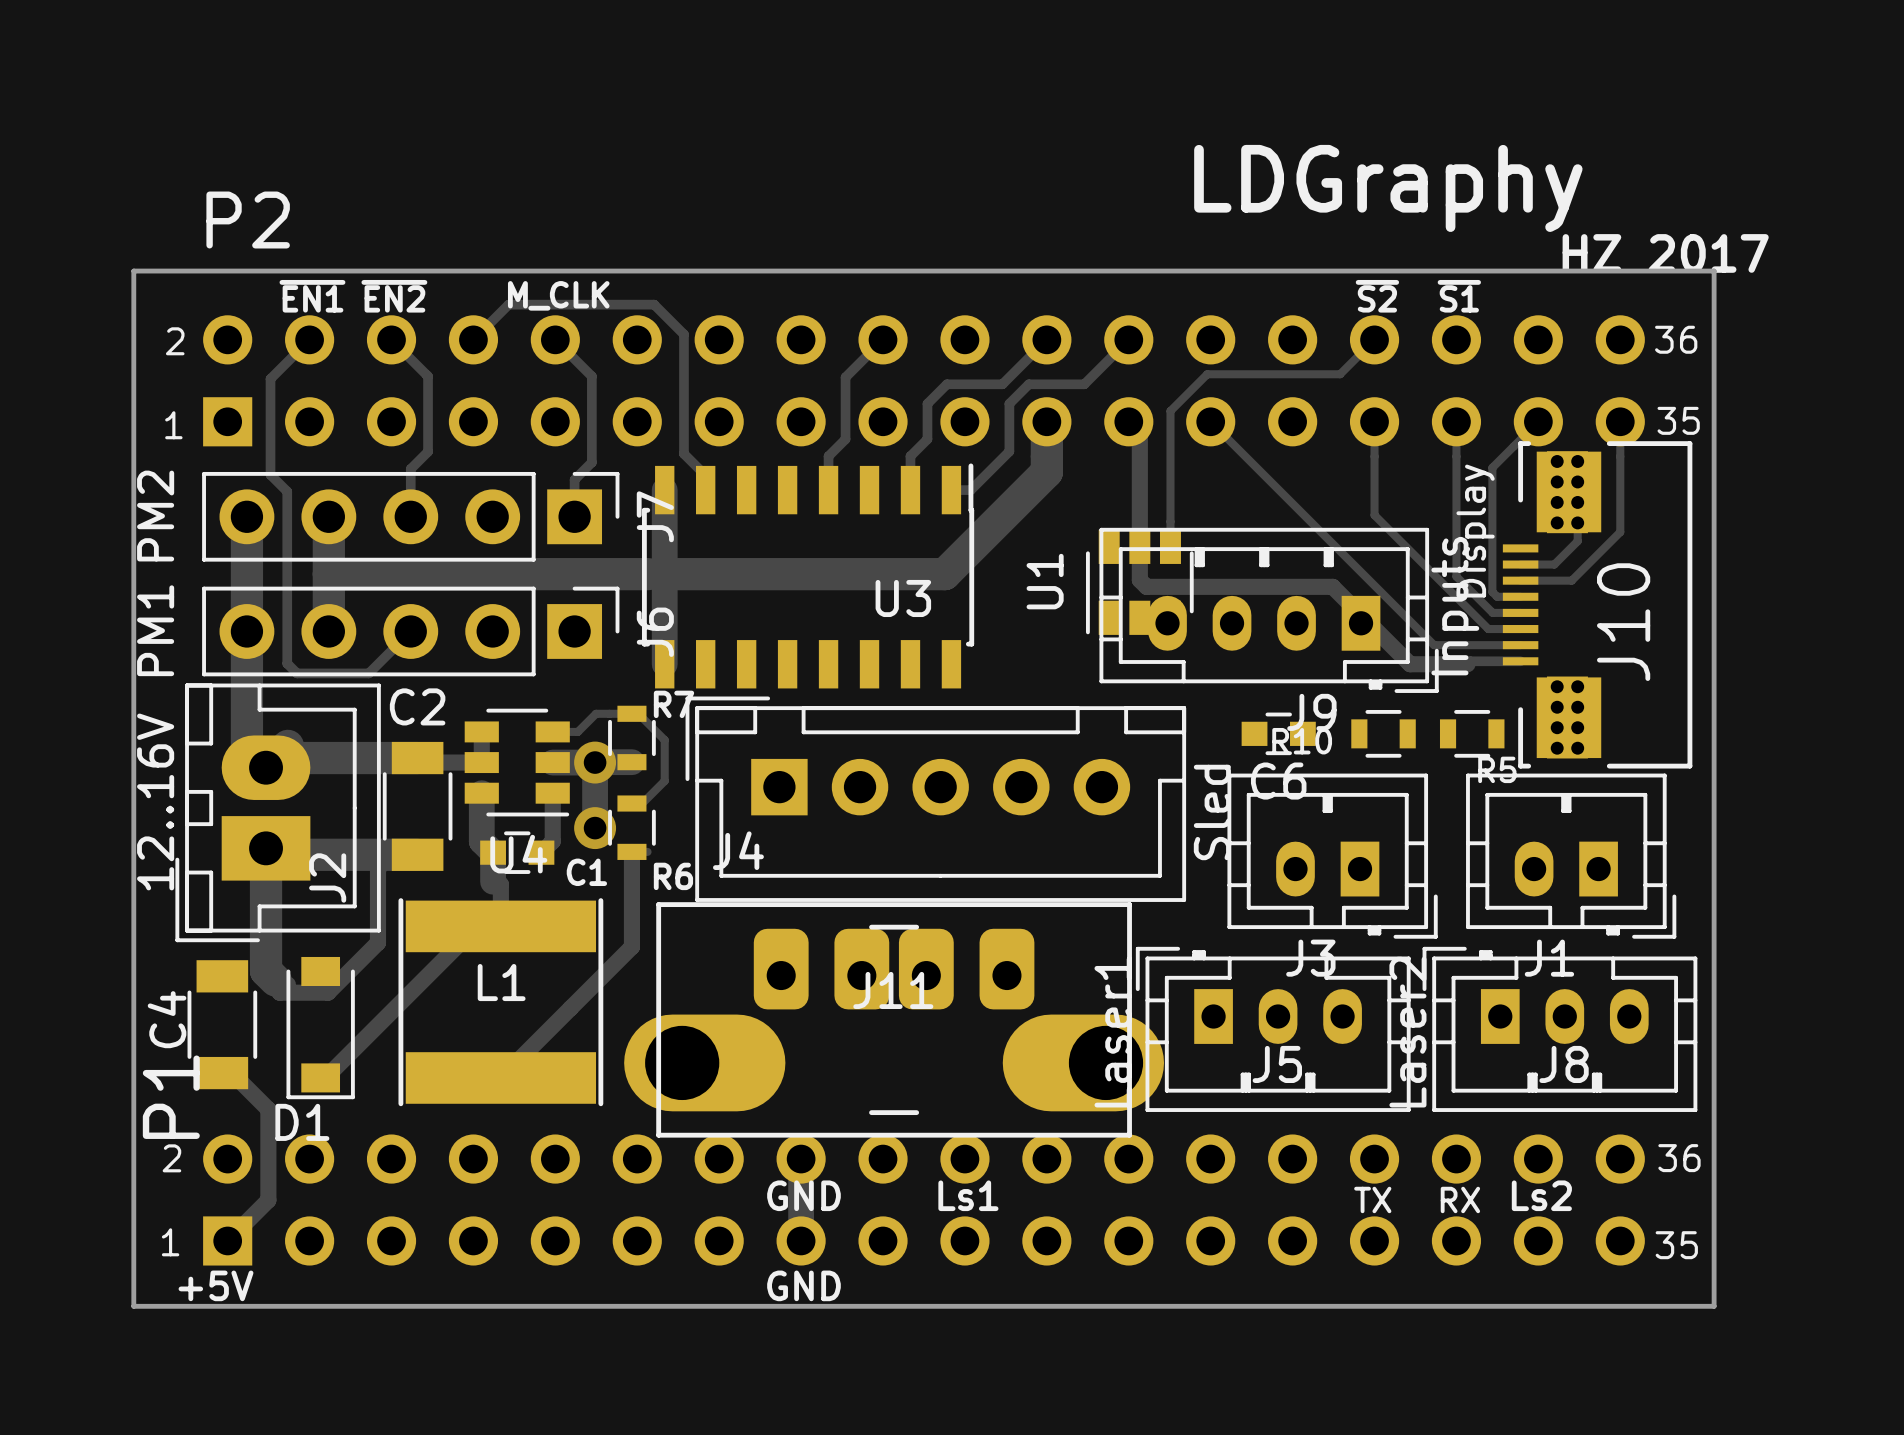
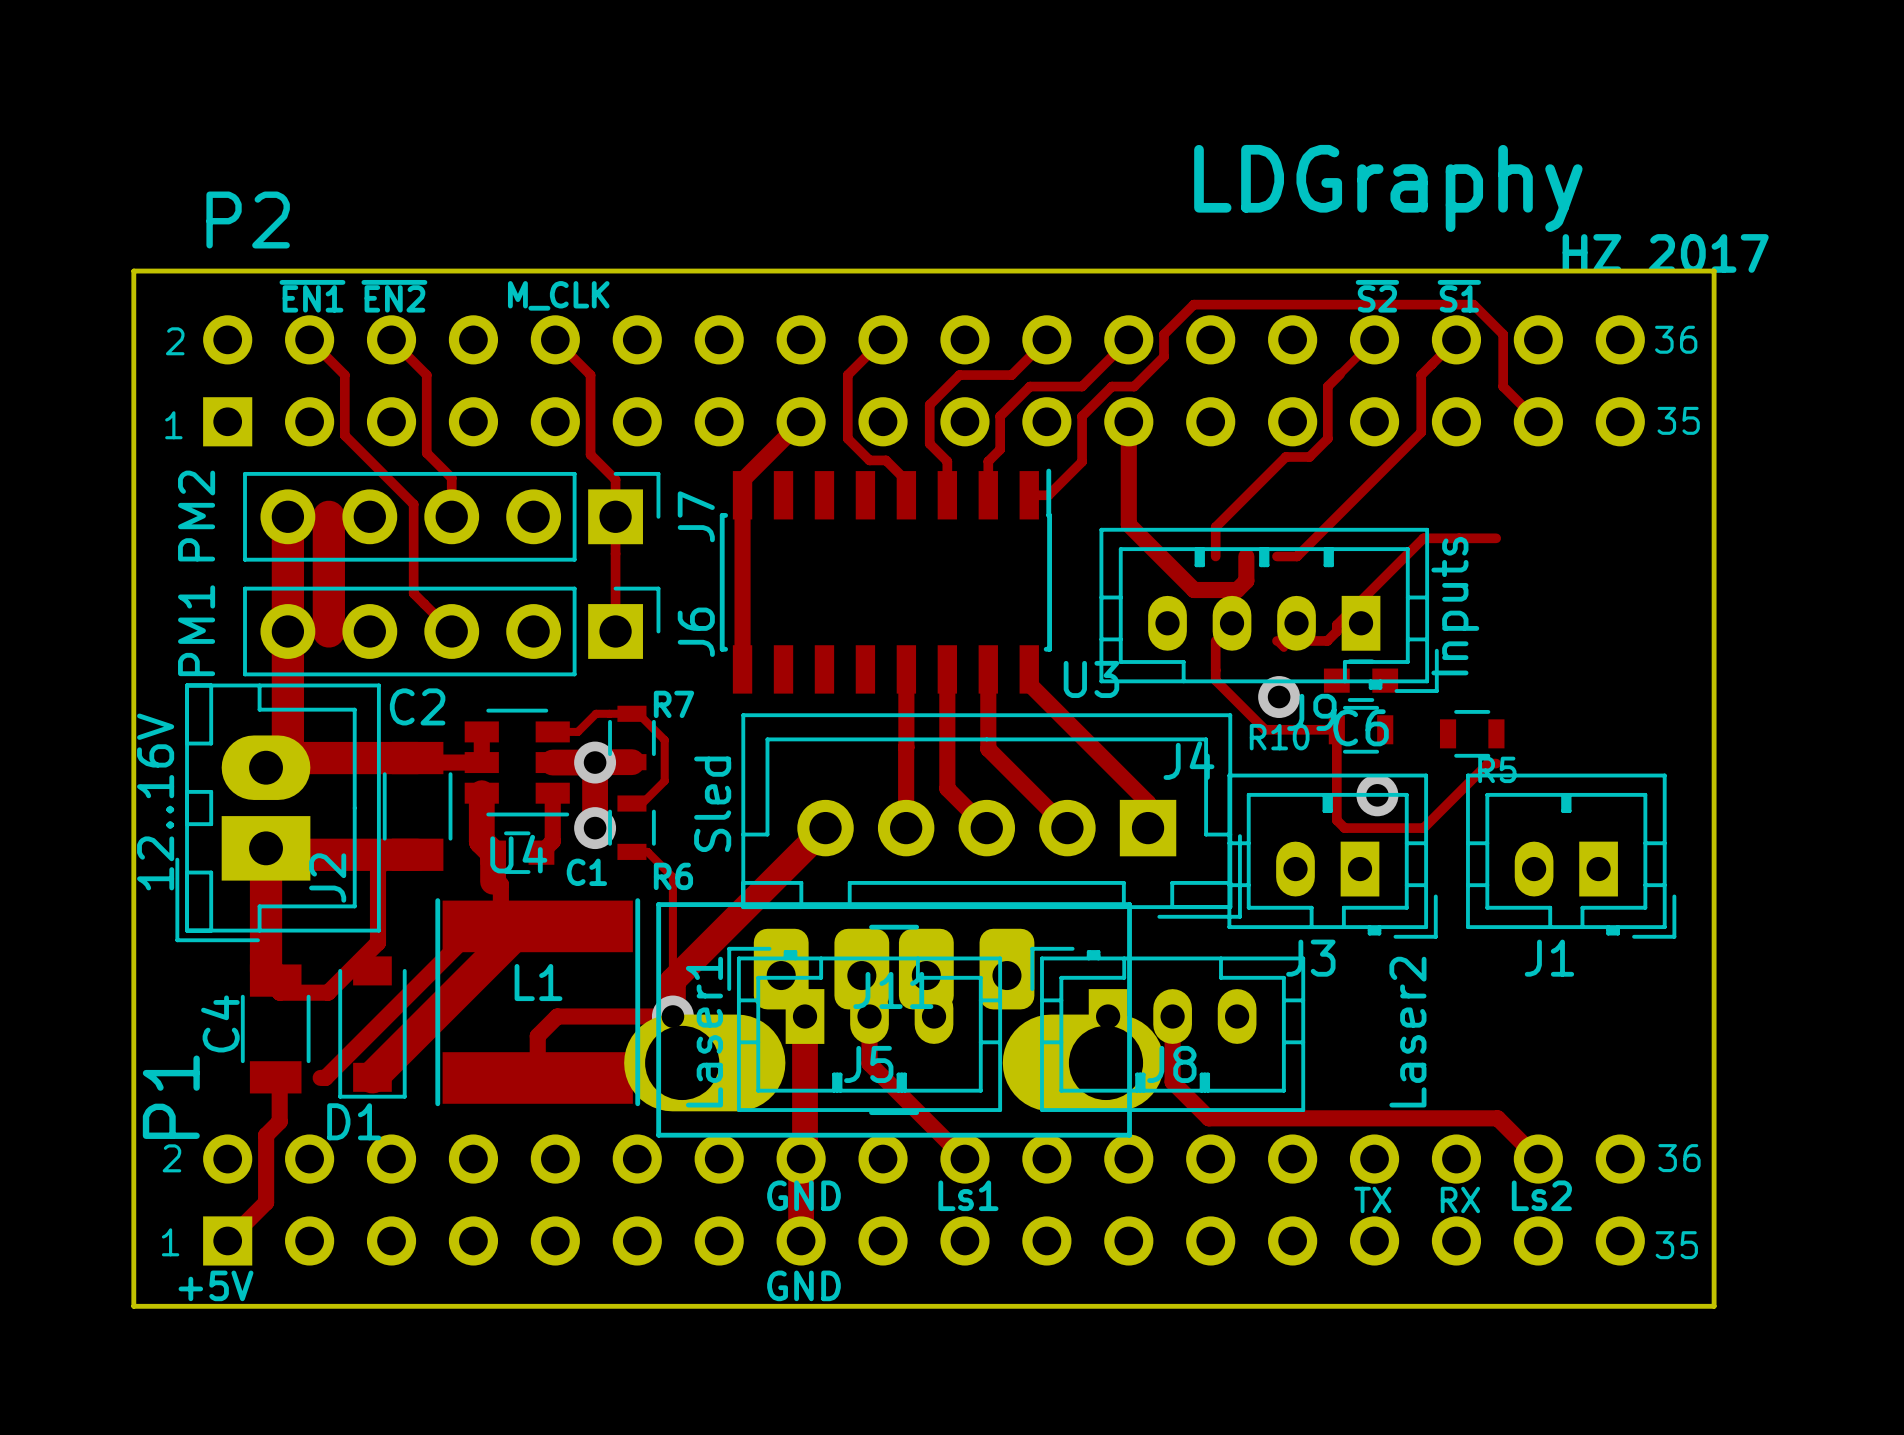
track: (309, 339) (270, 378) (270, 474) (287, 491) (287, 663) (297, 673) (368, 673) (410, 631) -> (309, 339) (344, 375) (344, 435) (413, 504) (413, 593) (451, 631)
track: (473, 339) (508, 304) (654, 304) (683, 334) (683, 453) (705, 475) (705, 490) -> none
track: none -> (1456, 339) (1421, 375) (1421, 432) (1297, 556) (1276, 556)
track: (1340, 374) (1207, 374) (1170, 411) (1170, 546) -> (1340, 374) (1327, 386) (1327, 438) (1309, 456) (1285, 456) (1215, 527) (1215, 556)
track: (426, 375) (428, 451) (410, 469) (410, 516) -> (426, 375) (426, 453) (451, 478) (451, 516)
track: (590, 375) (591, 462) (574, 479) (574, 516) -> (590, 375) (590, 454) (615, 479) (615, 631)
track: (847, 375) (845, 377) (845, 439) (828, 456) (828, 490) -> (847, 375) (847, 438) (869, 460) (886, 460) (906, 480) (906, 495)
track: (1011, 375) (1002, 384) (946, 384) (927, 403) (927, 439) (910, 456) (910, 490) -> (1011, 375) (959, 375) (929, 404) (929, 443) (947, 461) (947, 495)
track: (1084, 384) (1028, 384) (1009, 403) (1009, 451) (970, 490) (951, 490) -> (1084, 384) (1082, 386) (1029, 386) (1000, 416) (1000, 449) (988, 461) (988, 495)
track: none -> (801, 421) (742, 480) (742, 669)
track: (1046, 421) (1046, 472) (944, 574) (664, 574) -> none
track: (1128, 421) (1139, 432) (1139, 580) (1146, 586) (1332, 586) (1410, 664) (1467, 664) (1470, 661) (1520, 661) -> (1128, 421) (1128, 524) (1194, 590) (1237, 590) (1246, 580) (1246, 556)
track: (1210, 421) (1434, 645) (1520, 645) -> none
track: (1374, 421) (1374, 515) (1488, 629) (1520, 629) -> none
track: (1456, 421) (1456, 576) (1492, 612) (1520, 612) -> none
track: (1538, 421) (1492, 467) (1492, 592) (1497, 596) (1520, 596) -> (1538, 421) (1503, 386) (1503, 334) (1473, 304) (1193, 304) (1164, 334) (1164, 356) (1134, 386) (1111, 386) (1082, 416) (1082, 461) (1048, 495) (1029, 495)
track: (1620, 421) (1620, 532) (1571, 580) (1520, 580) -> none
track: (246, 516) (246, 748) (266, 767) -> none
track: none -> (287, 516) (287, 745)
J7 position: (410, 516) -> (451, 516)
track: (1577, 522) (1577, 541) (1554, 564) (1520, 564) -> none
track: none -> (1496, 538) (1423, 538) (1336, 625) (1336, 631) (1327, 640) (1276, 640) (1283, 647)
track: (328, 574) (648, 574) (664, 557) (664, 490) (664, 664) -> none
U3 position: (808, 575) -> (885, 581)
U1: (1139, 582) -> none
U3 name position: U3 (903, 598) -> U3 (1091, 679)
J10: Display (1597, 604) -> none
J6 position: (410, 631) -> (451, 631)
track: none -> (1215, 650) (1215, 640) (1215, 680) (1265, 729) (1336, 729) (1336, 820) (1344, 828) (1423, 828) (1488, 763) (1496, 763)
track: none -> (906, 669) (906, 747)
track: none -> (947, 669) (947, 788) (986, 828)
track: none -> (988, 669) (988, 748) (1067, 828)
track: none -> (1029, 669) (1029, 683) (1148, 802) (1148, 828)
via: none -> (1279, 697)
C6 position: (1278, 733) -> (1361, 680)
R10 position: (1383, 733) -> (1361, 729)
track: none -> (906, 747) (906, 828)
via: none -> (1377, 795)
J4 rotation: 0° (935, 799) -> 180° (991, 816)
track: none -> (825, 828) (672, 980) (672, 1016)
track: (631, 851) (631, 946) (500, 1077) -> none
track: none -> (647, 851) (672, 877) (672, 1016)
track: none -> (523, 926) (372, 1077)
L1 position: (500, 1002) -> (537, 1002)
track: none -> (672, 1016) (557, 1016) (537, 1036) (537, 1077)
via: none -> (672, 1016)
track: none -> (805, 1016) (805, 1155)
track: none -> (869, 1016) (869, 1063) (964, 1159)
track: none -> (1172, 1016) (1172, 1082) (1208, 1118) (1497, 1118) (1538, 1159)
C4 position: (222, 1024) -> (275, 1028)
D1 position: (320, 1028) -> (372, 1027)
J5 position: (1273, 1029) -> (864, 1029)
J8 position: (1559, 1029) -> (1167, 1029)
track: (222, 1073) (232, 1073) (268, 1109) (268, 1200) (266, 1202) -> (279, 1089) (279, 1121) (266, 1135) (266, 1202)

